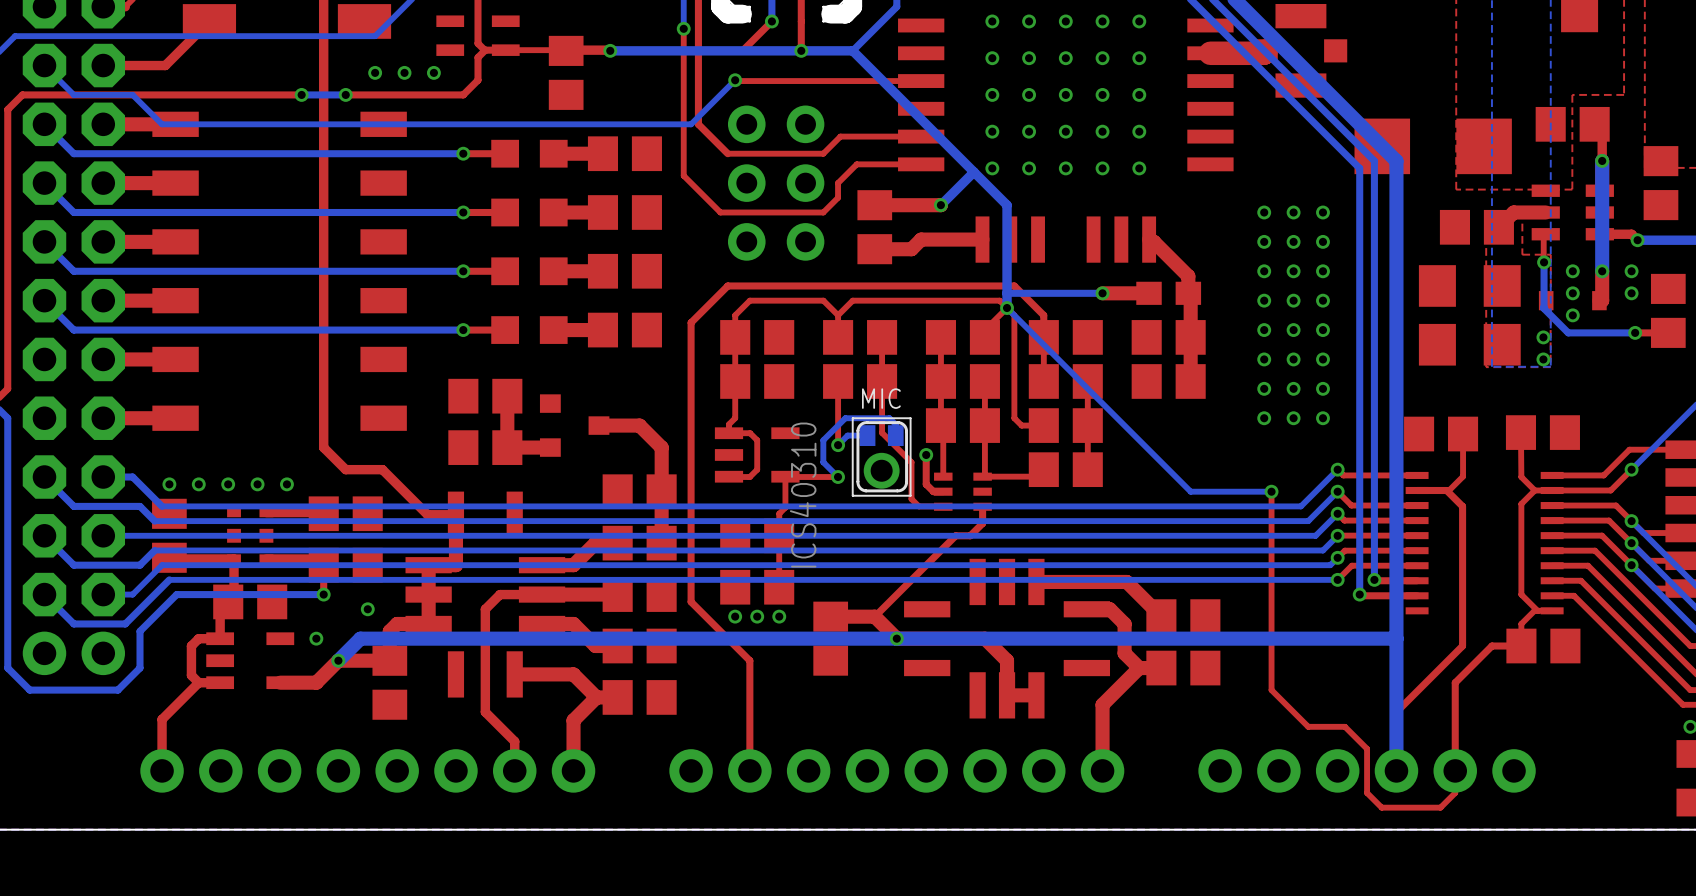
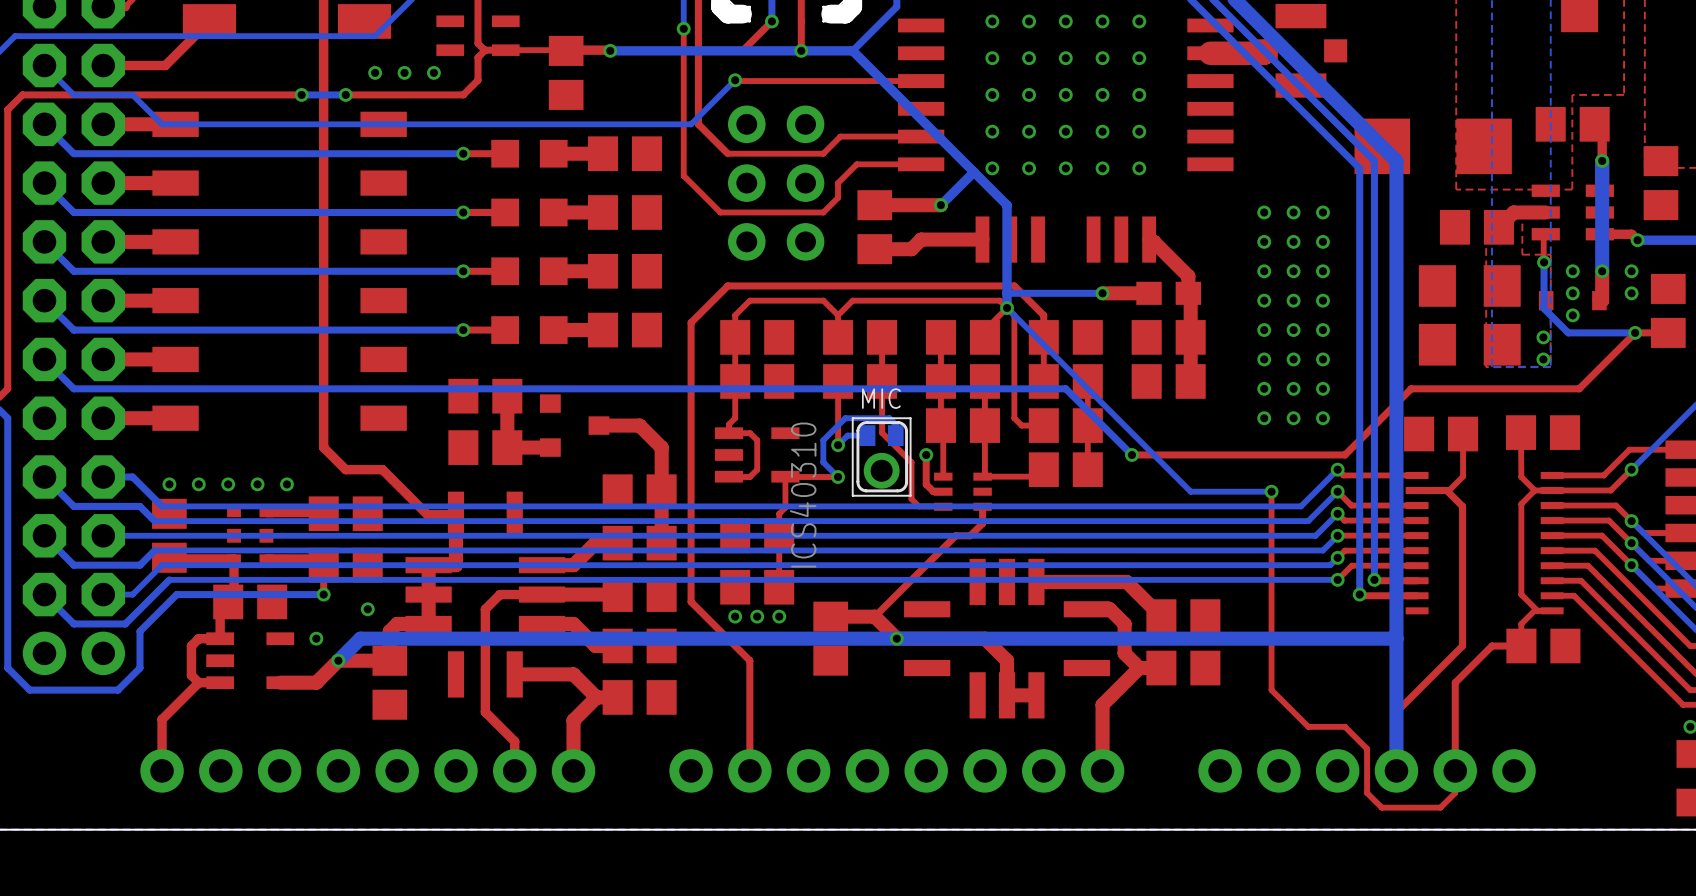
top track: none -> (1635, 332) (1579, 388) (1411, 388) (1345, 454) (1131, 454)
bottom track: none -> (44, 359) (73, 388) (1065, 388) (1131, 454)
via: none -> (1131, 454)

